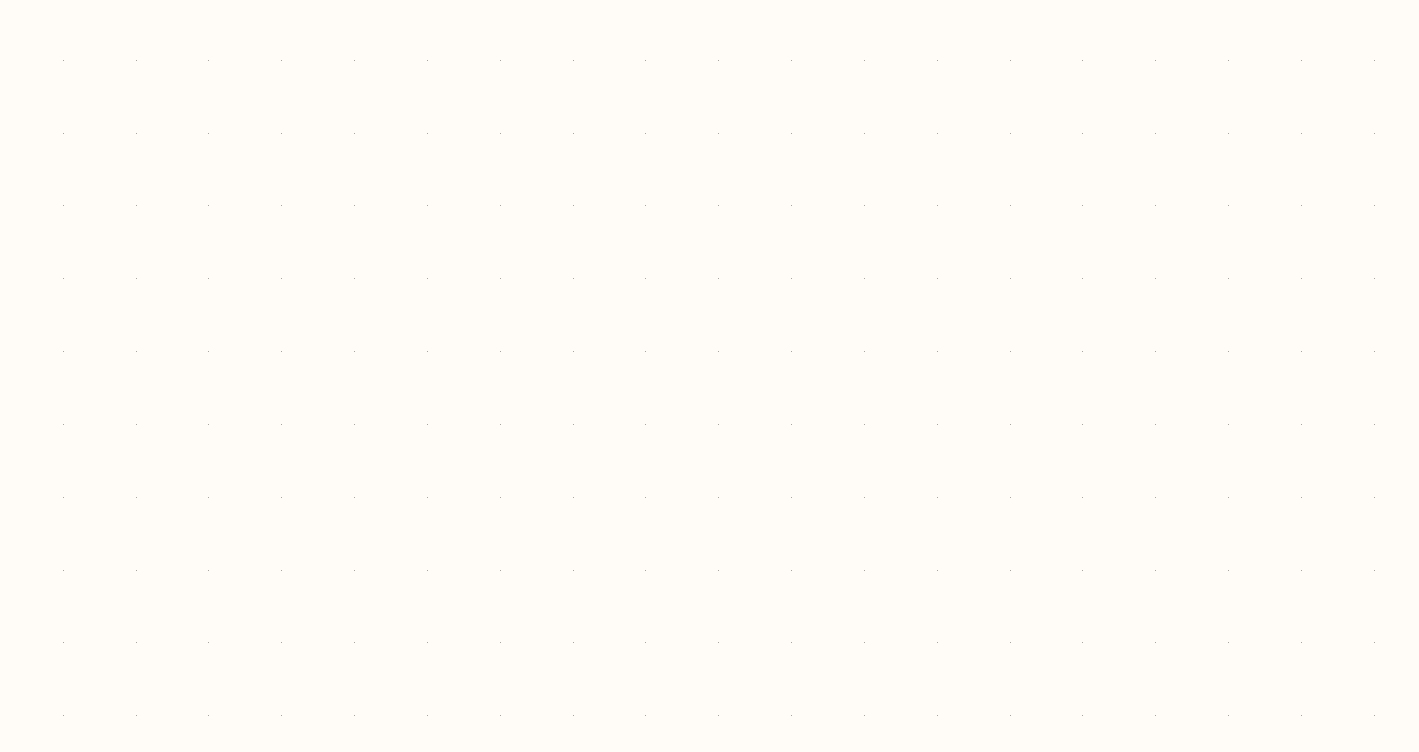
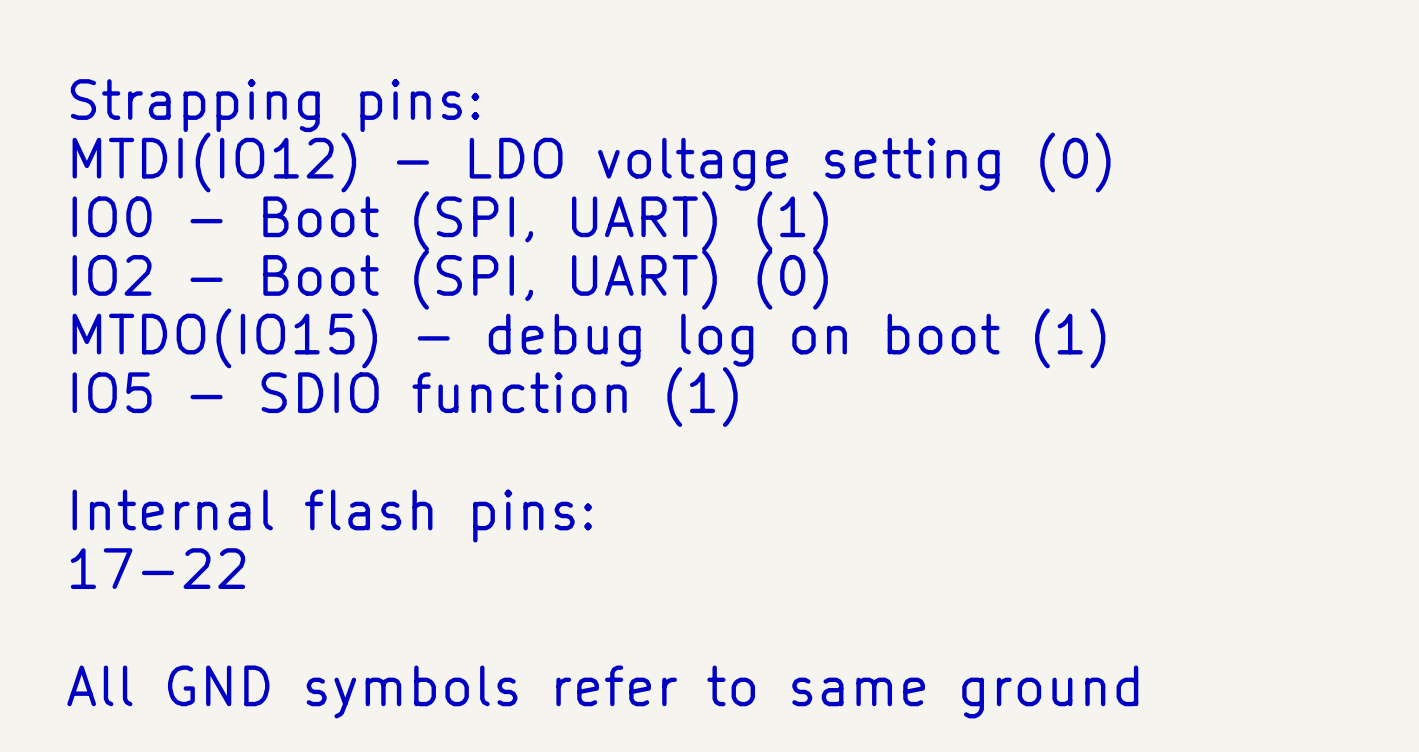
text: none -> Strapping pins: (275, 105)
text: none -> MTDI(IO12) - LDO voltage setting (0) (591, 162)
text: none -> IO0 - Boot (SPI, UART) (1) (450, 221)
text: none -> IO2 - Boot (SPI, UART) (0) (450, 279)
text: none -> MTDO(IO15) - debug log on boot (1) (588, 338)
text: none -> IO5 - SDIO function (1) (405, 397)
text: none -> Internal flash pins: (332, 516)
text: none -> 17-22 (157, 568)
text: none -> All GND symbols refer to same ground (602, 691)

